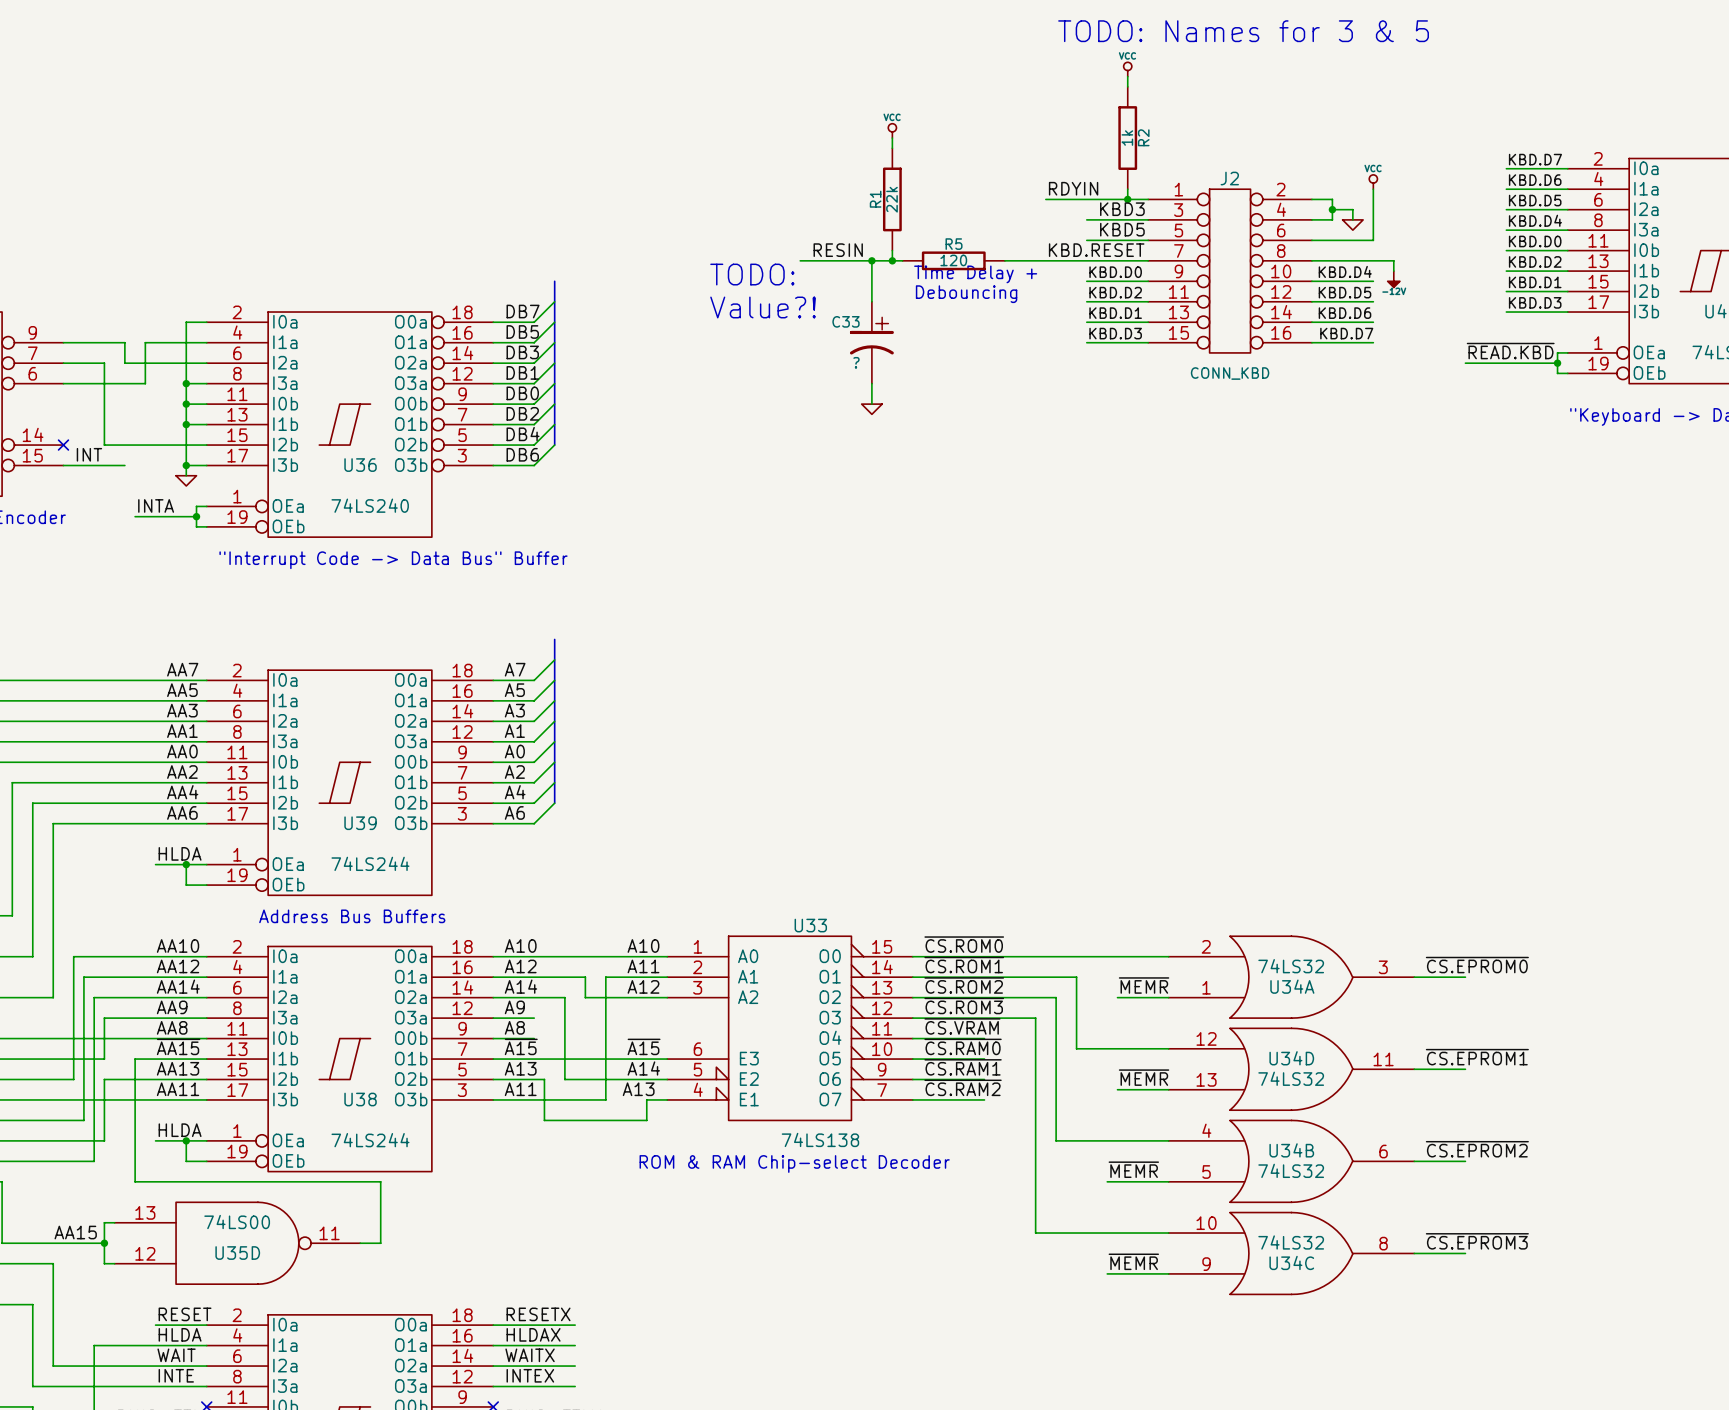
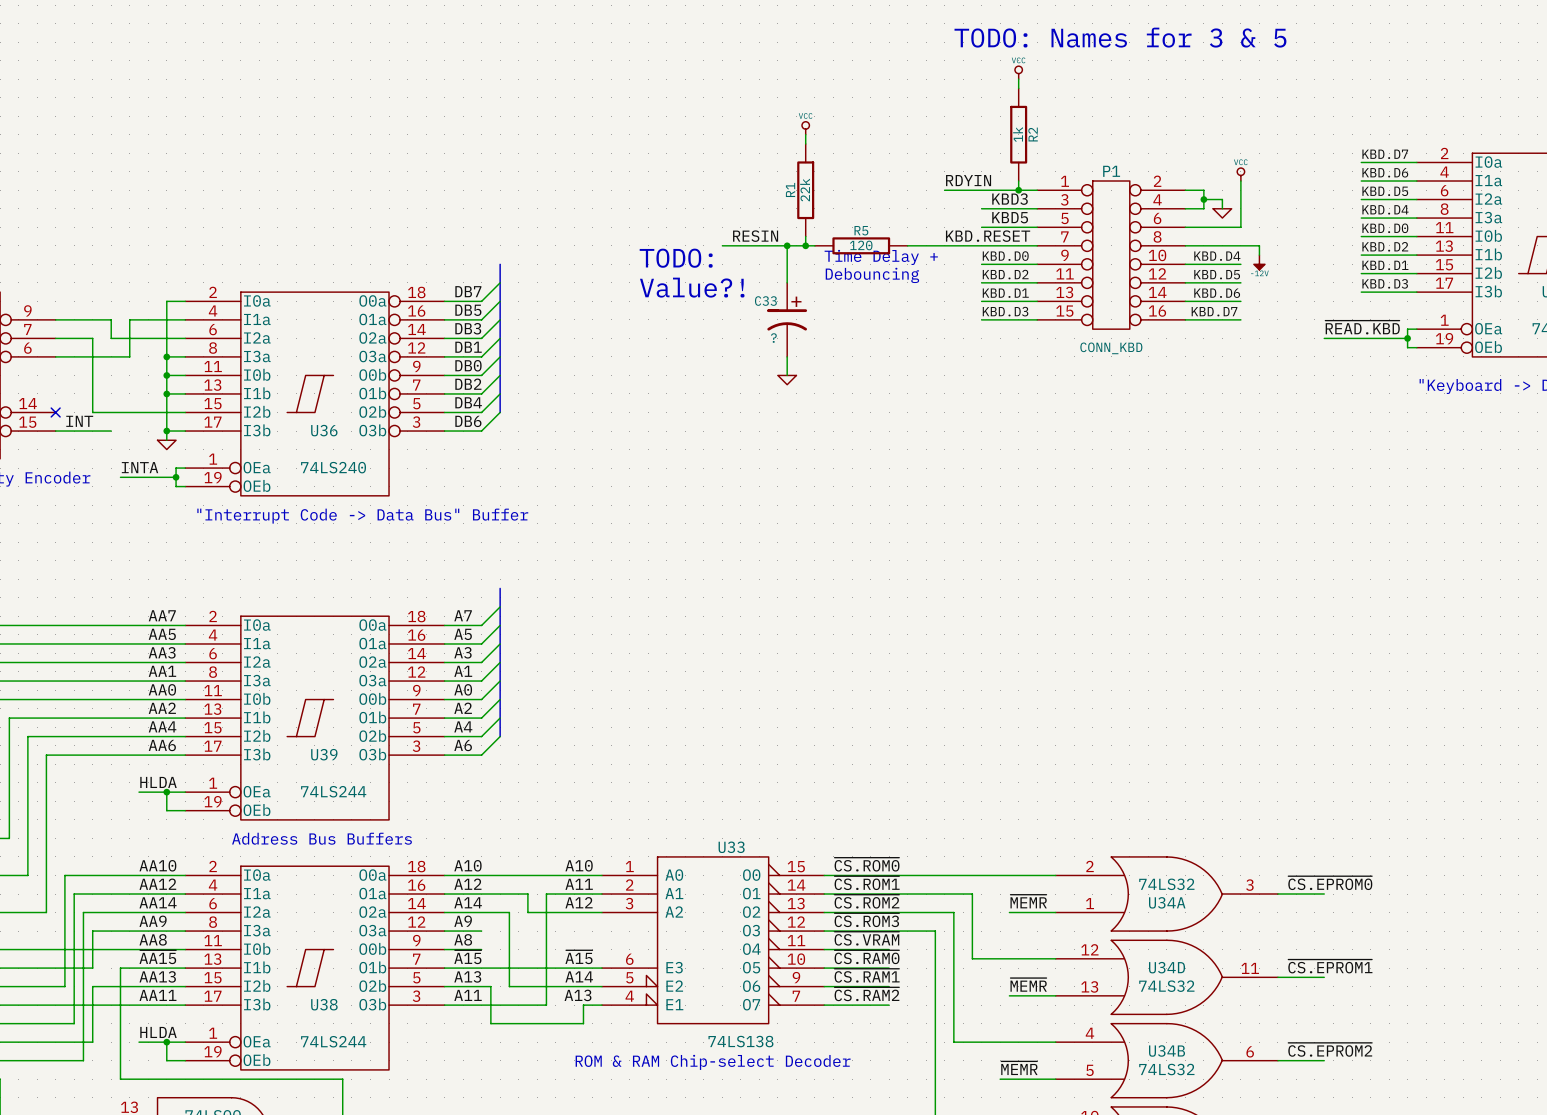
J2 name: J2 (1229, 178) -> P1 (1111, 171)

